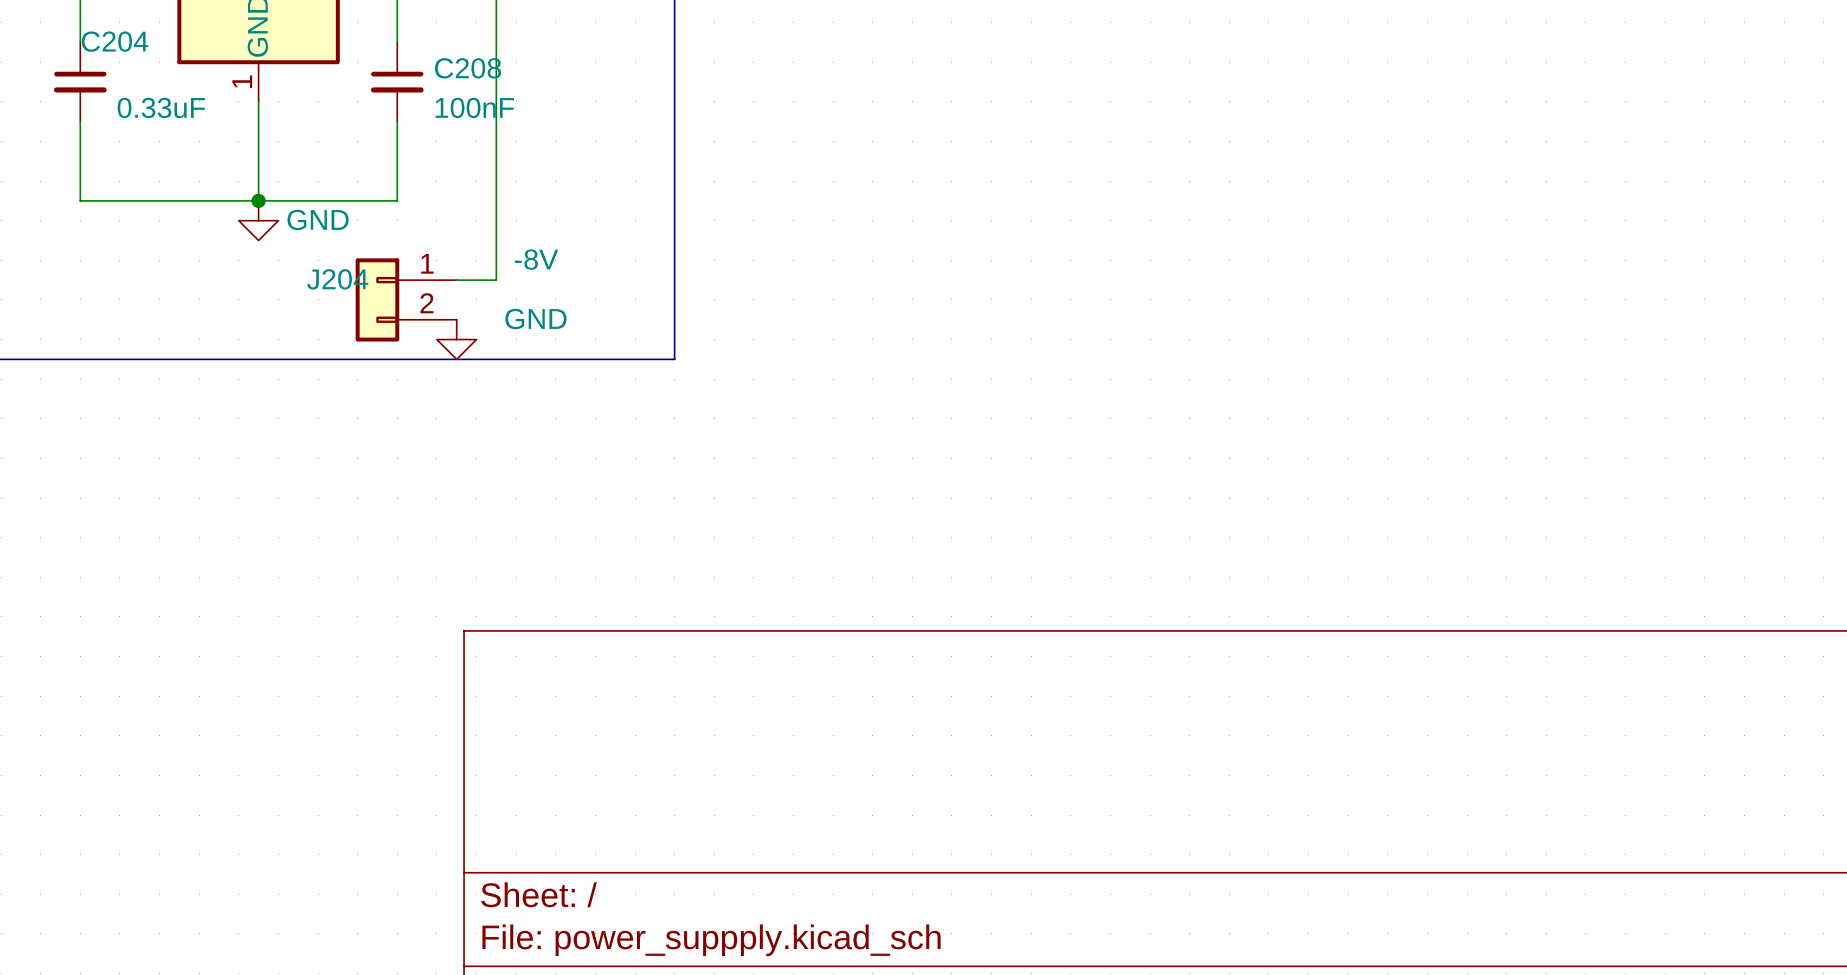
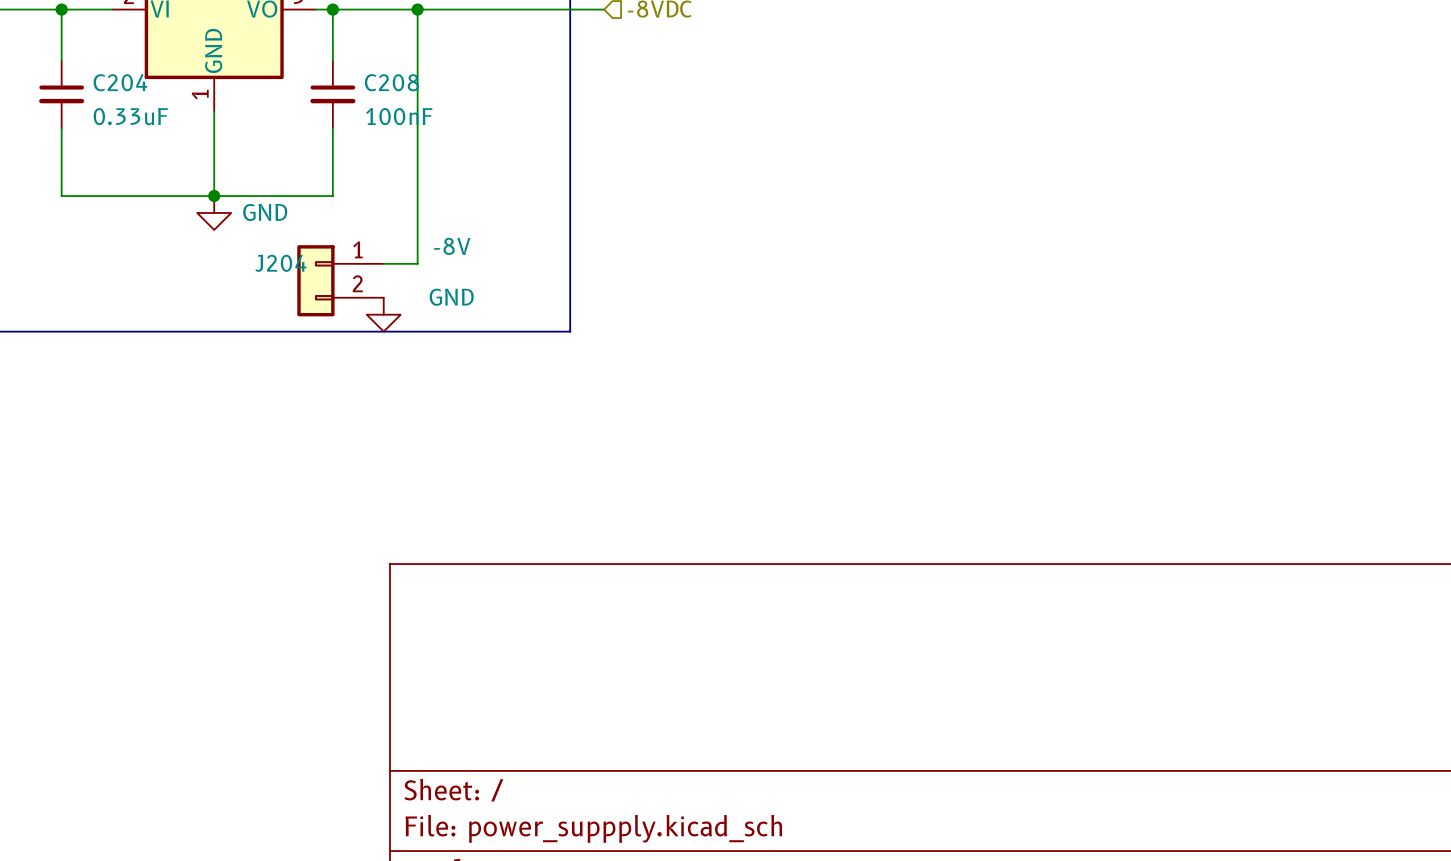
C204 name position: C204 (115, 41) -> C204 (120, 82)

